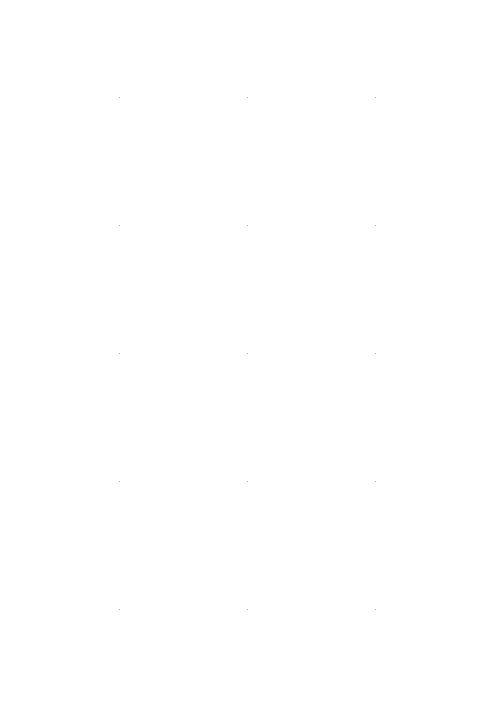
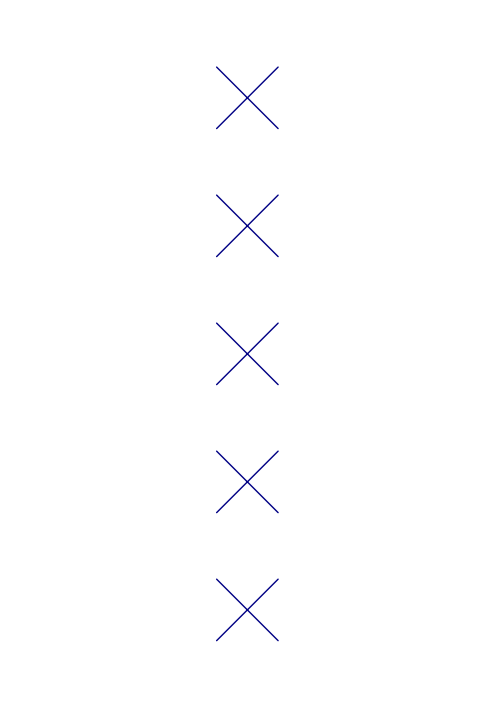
no-connect mark: none -> (247, 97)
no-connect mark: none -> (247, 225)
no-connect mark: none -> (247, 353)
no-connect mark: none -> (247, 481)
no-connect mark: none -> (247, 609)

